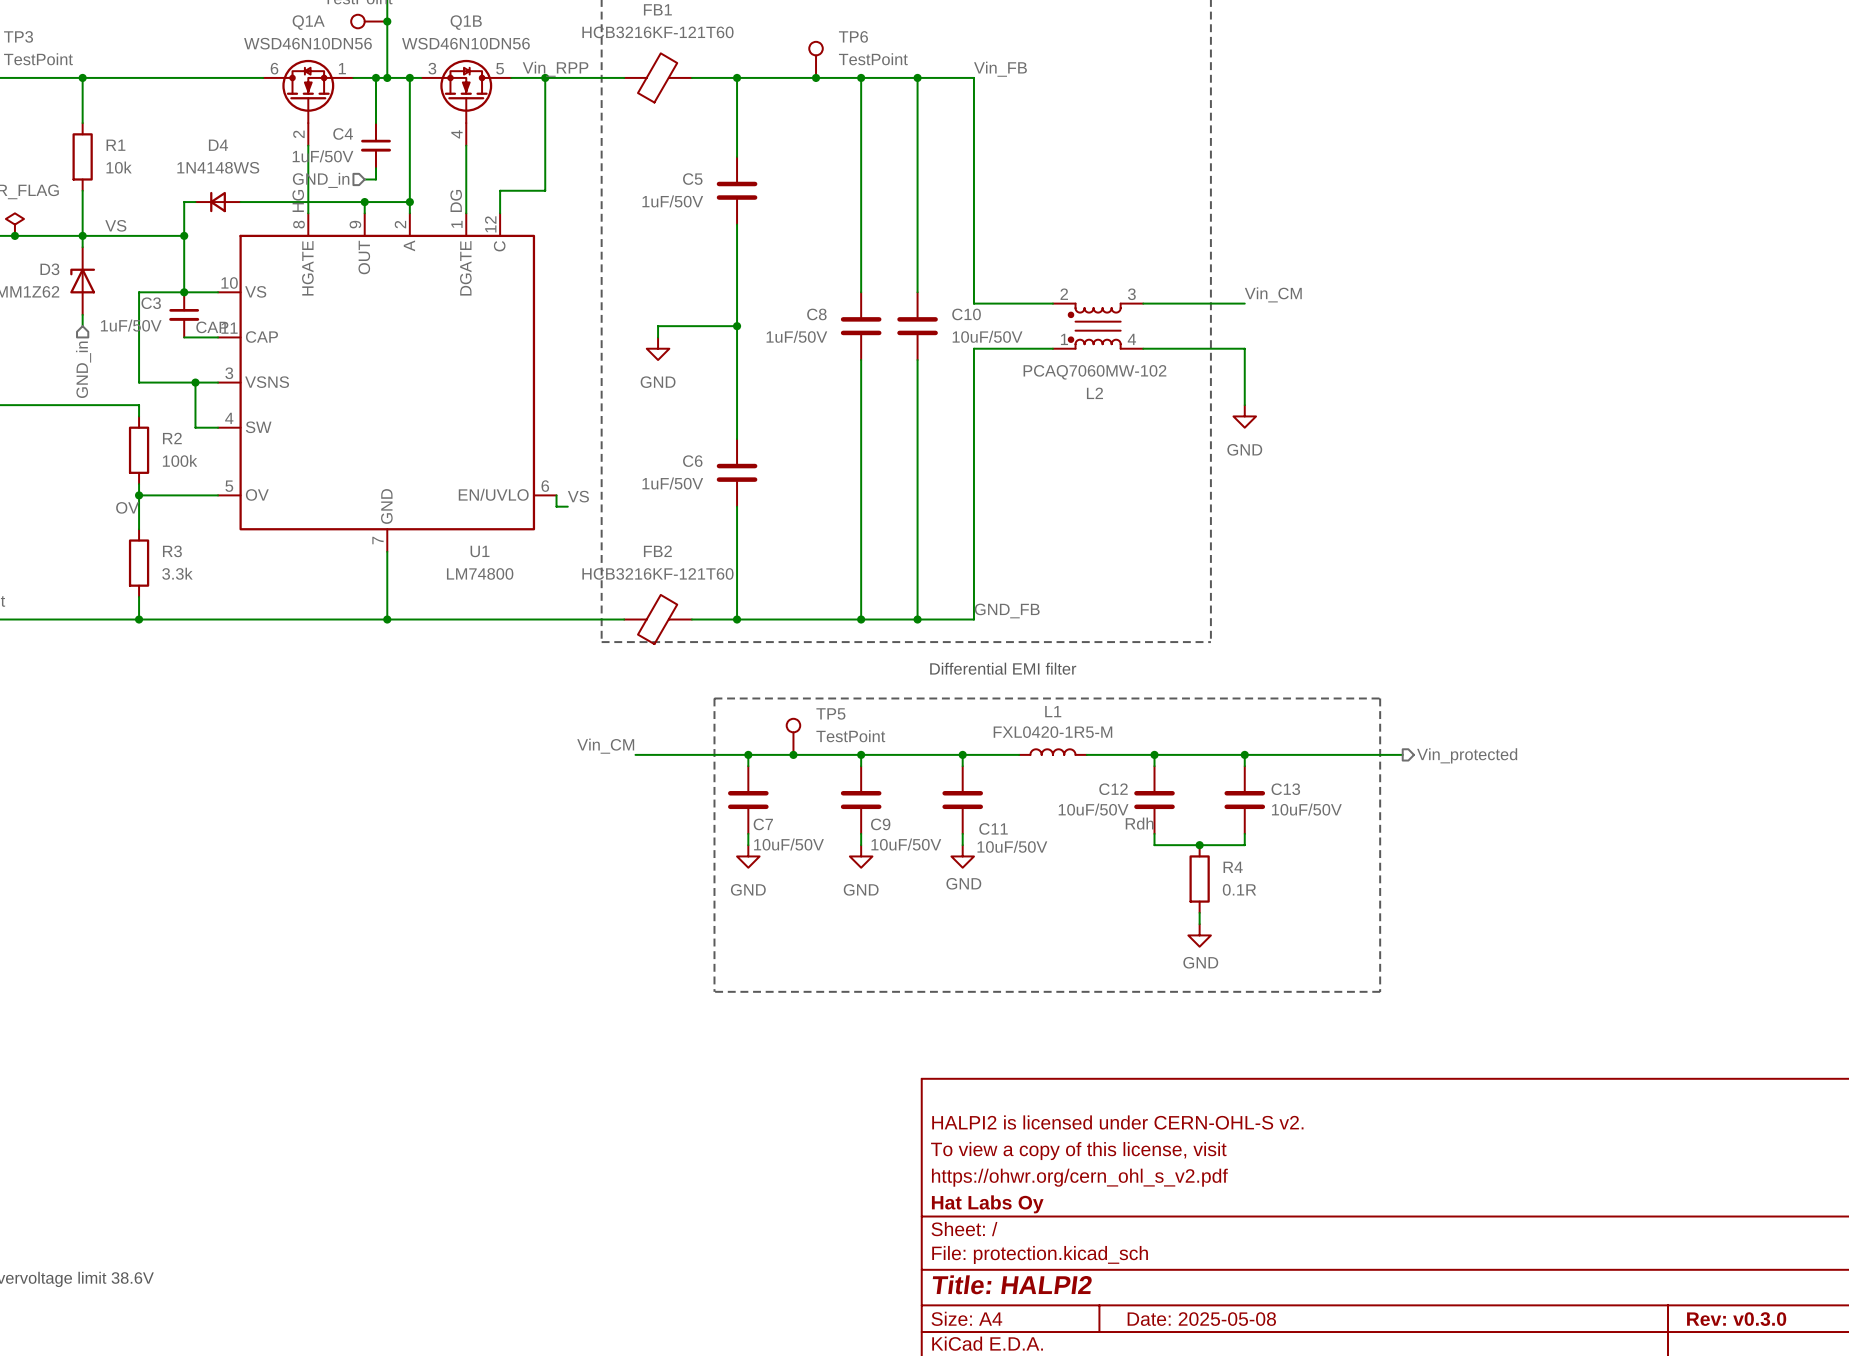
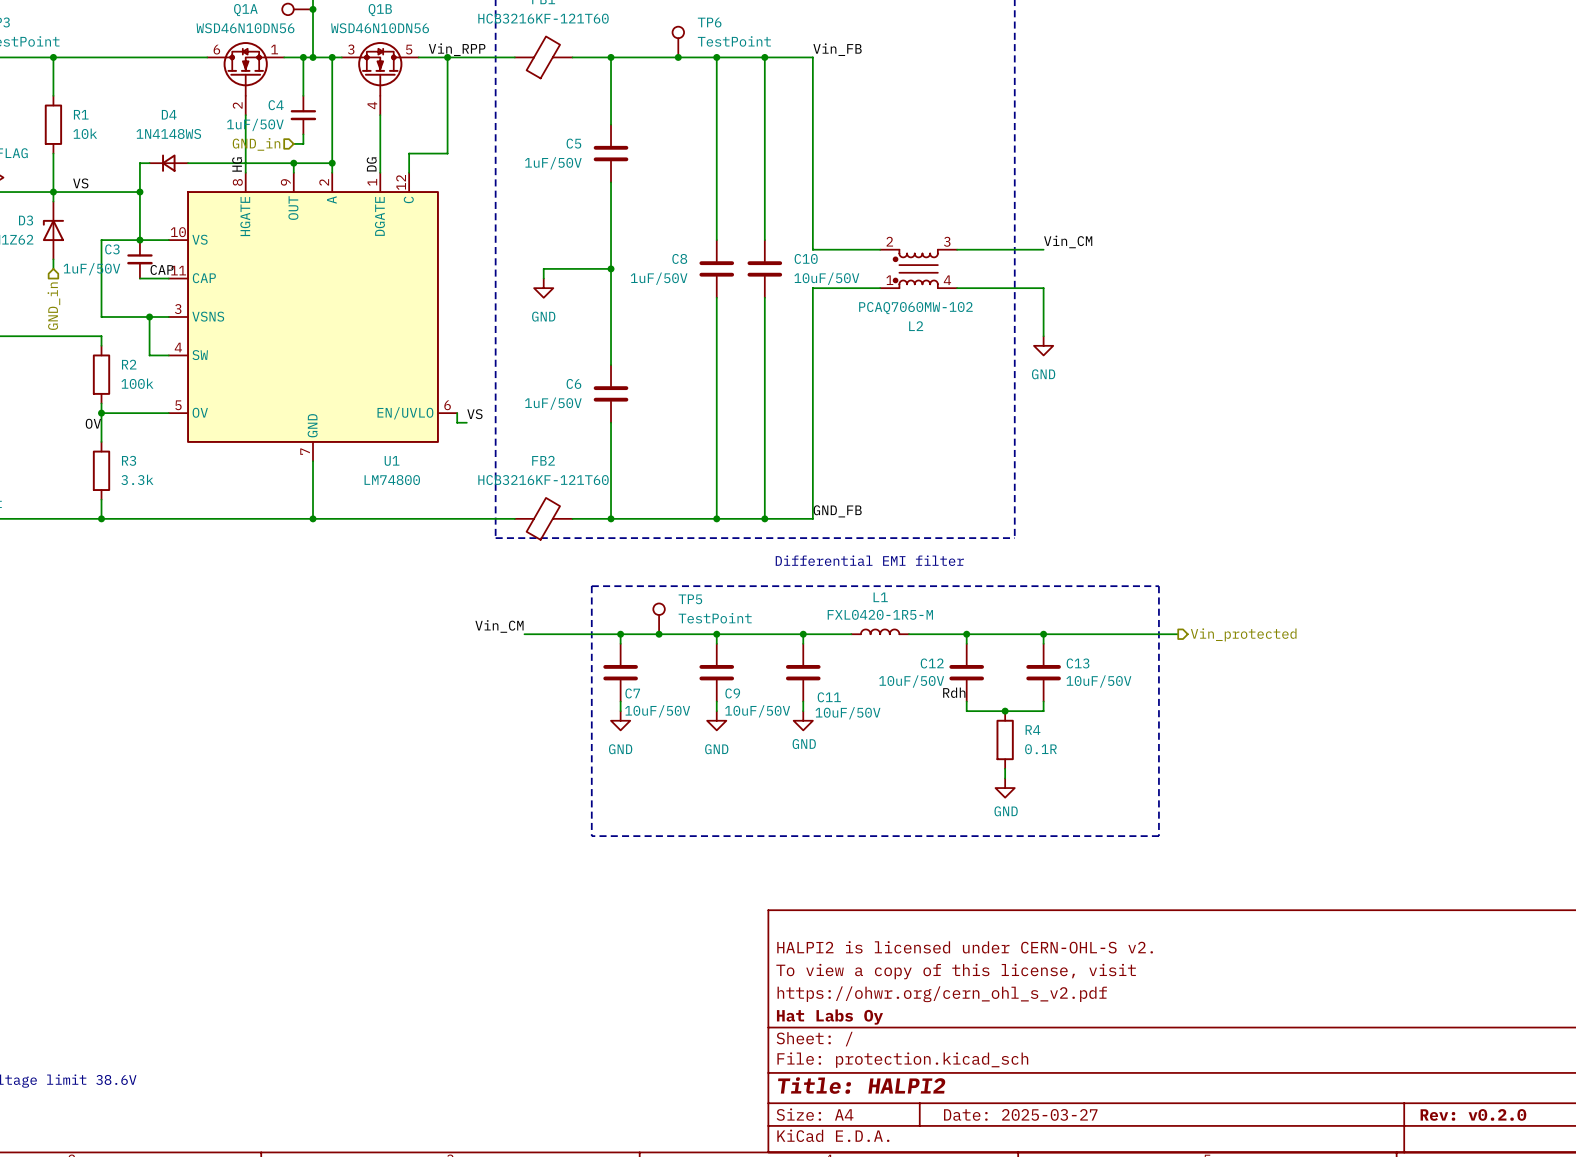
title block: Date: 2025-05-08 (1201, 1319) -> Date: 2025-03-27 (1020, 1114)
title block: Rev: v0.3.0 (1736, 1319) -> Rev: v0.2.0 (1473, 1114)

